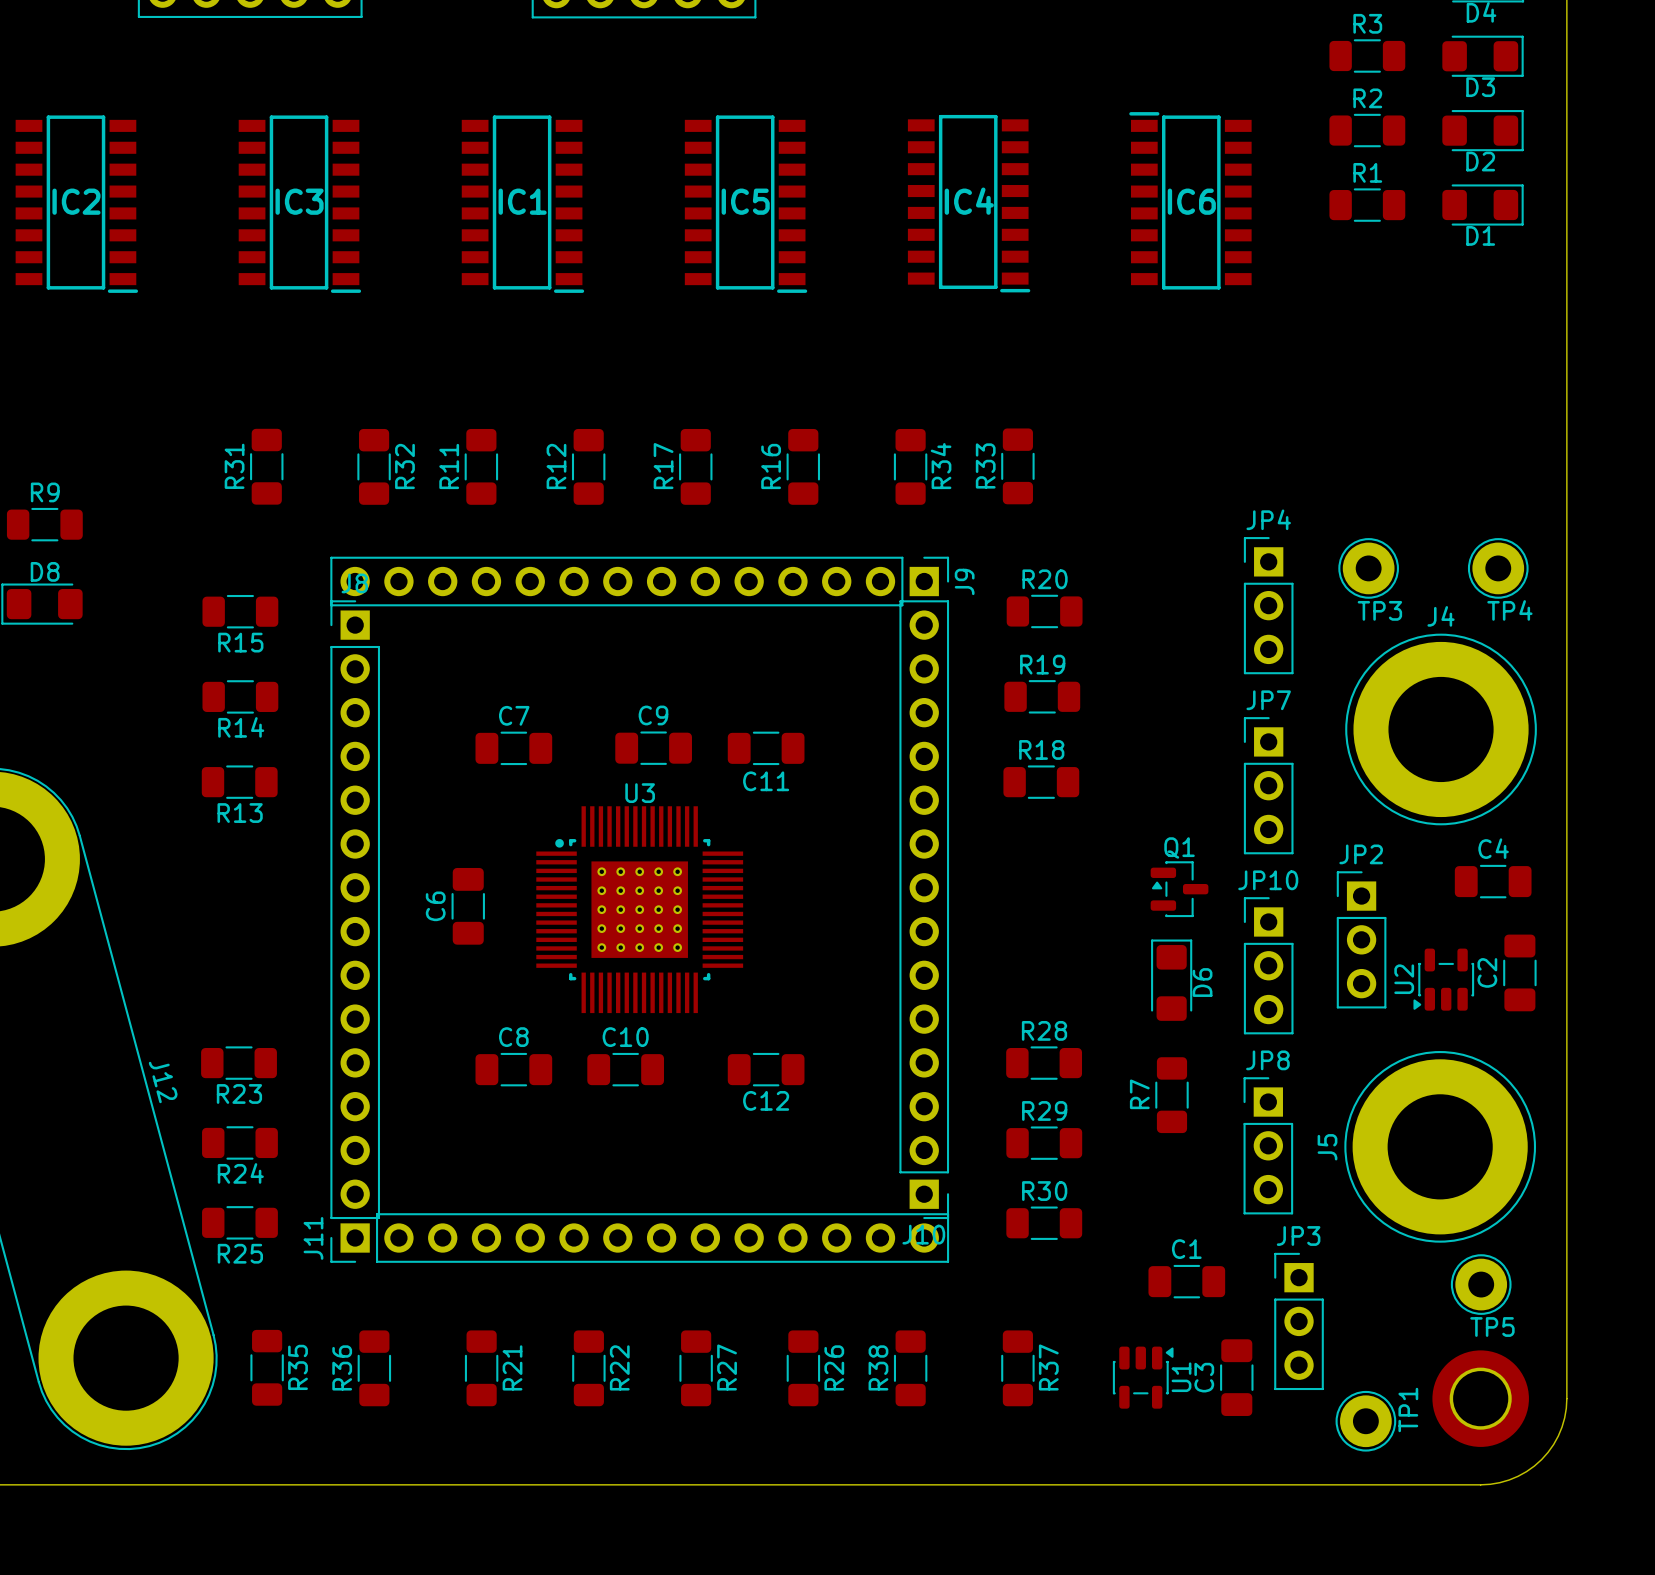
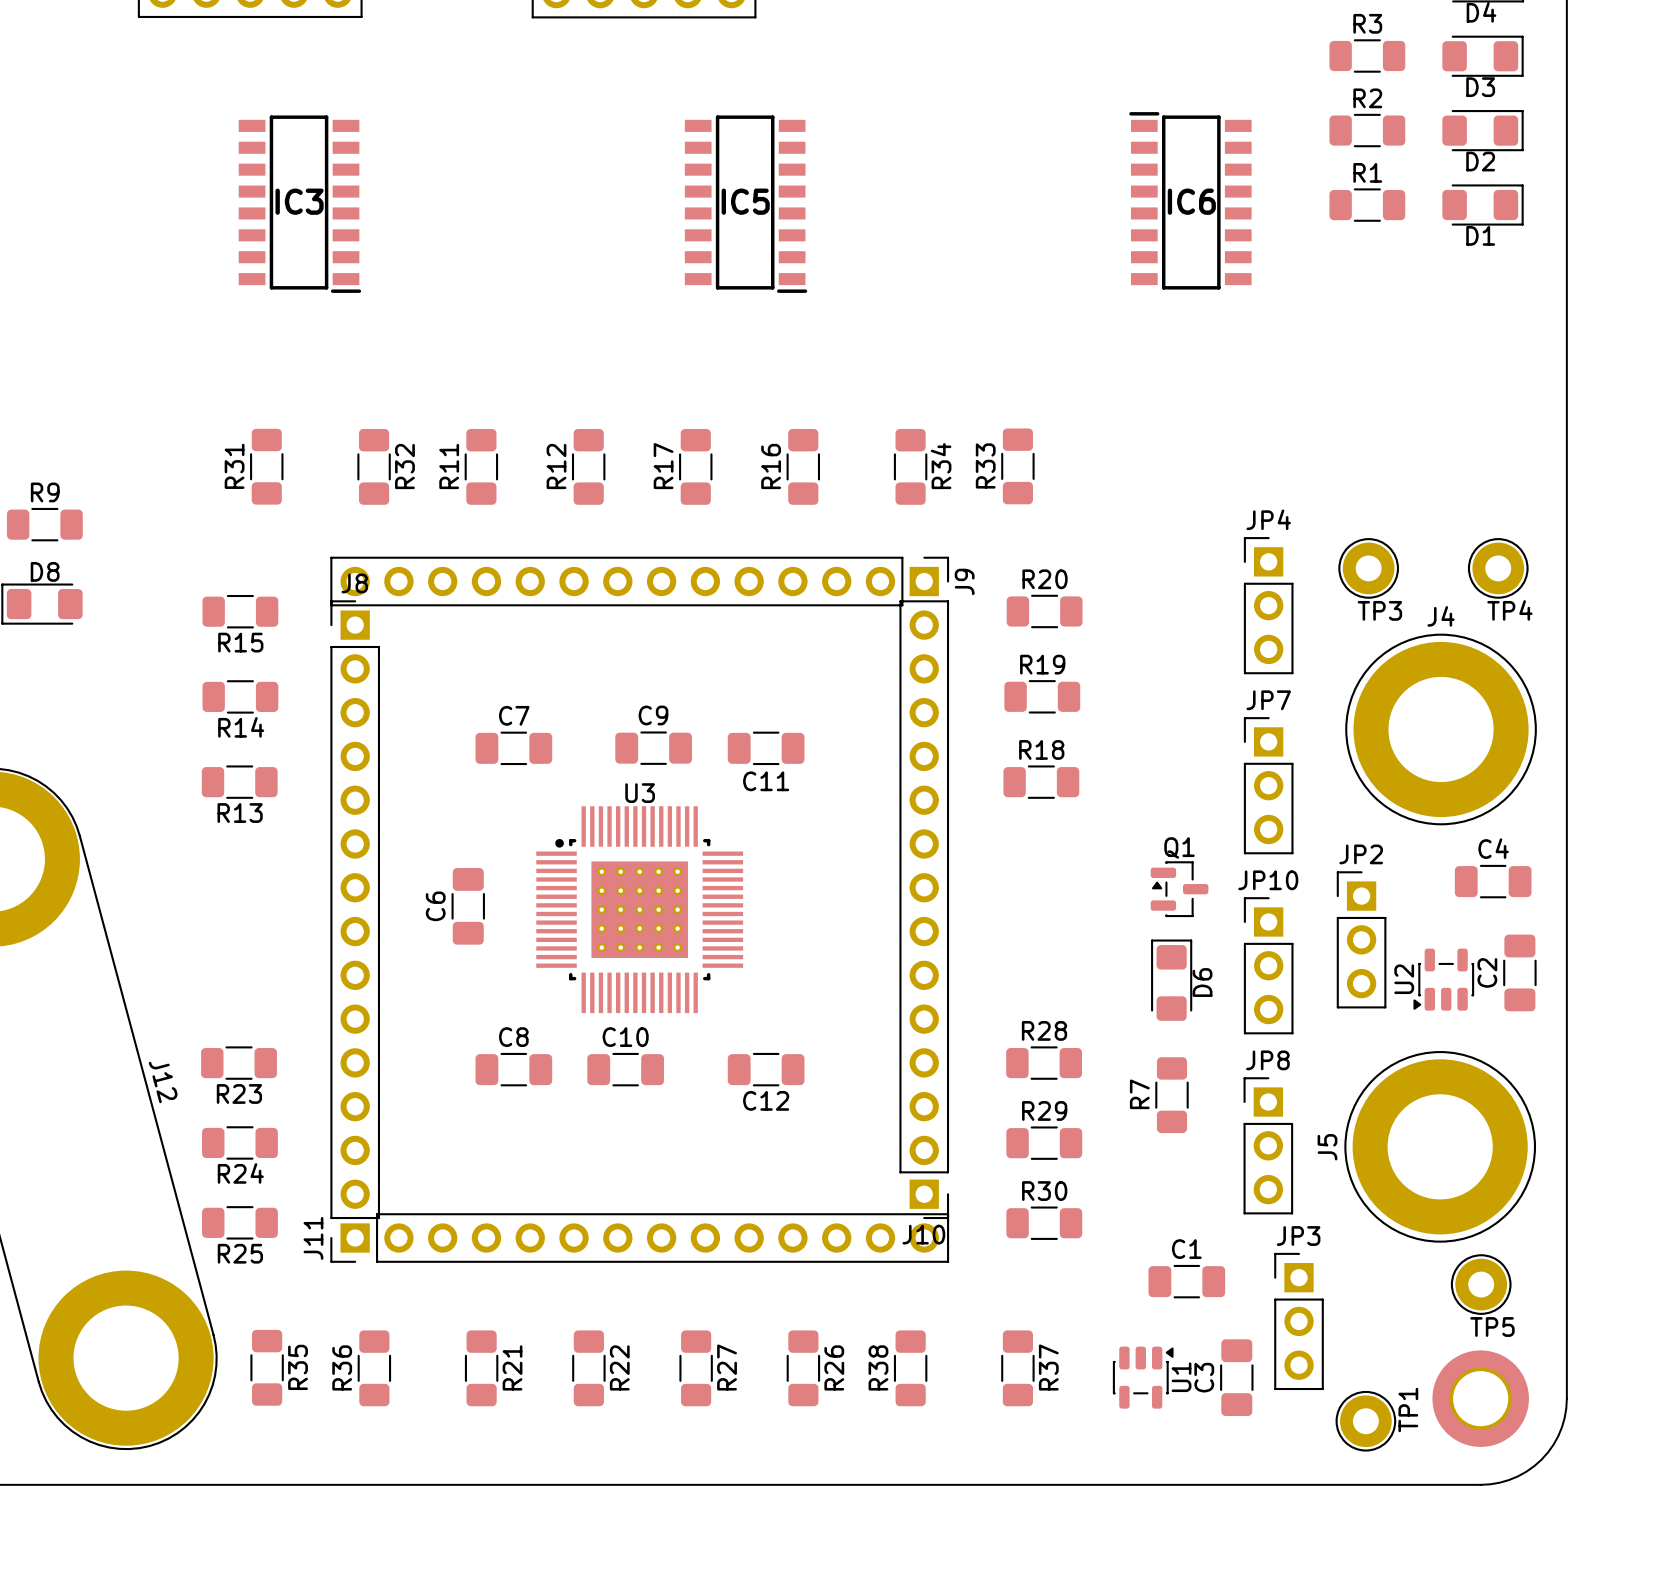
IC4: (969, 203) -> none
IC2: (76, 204) -> none
IC1: (522, 204) -> none

